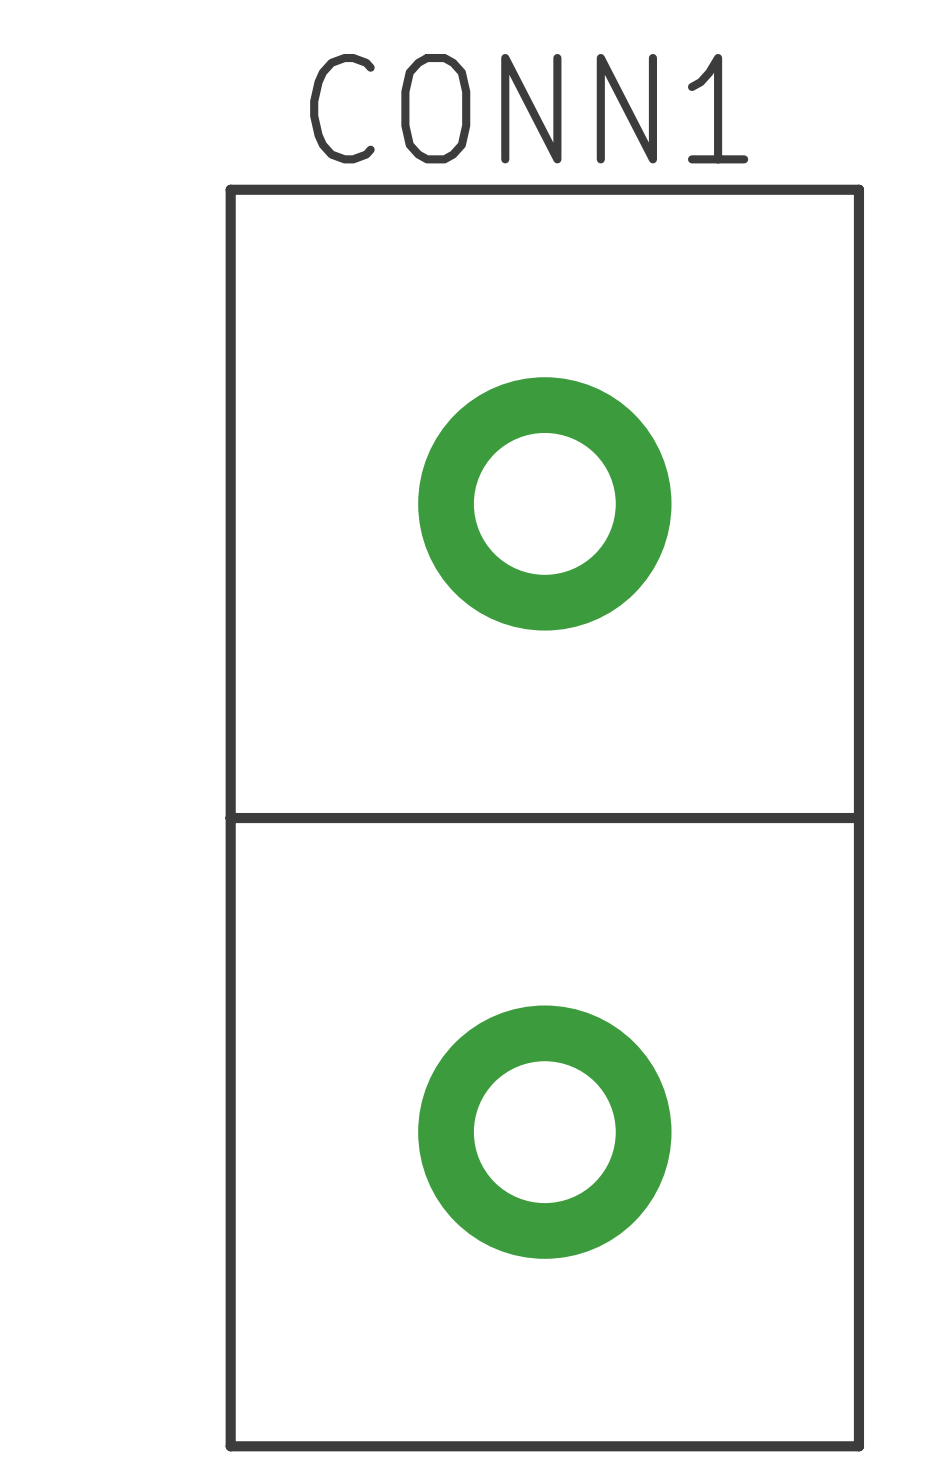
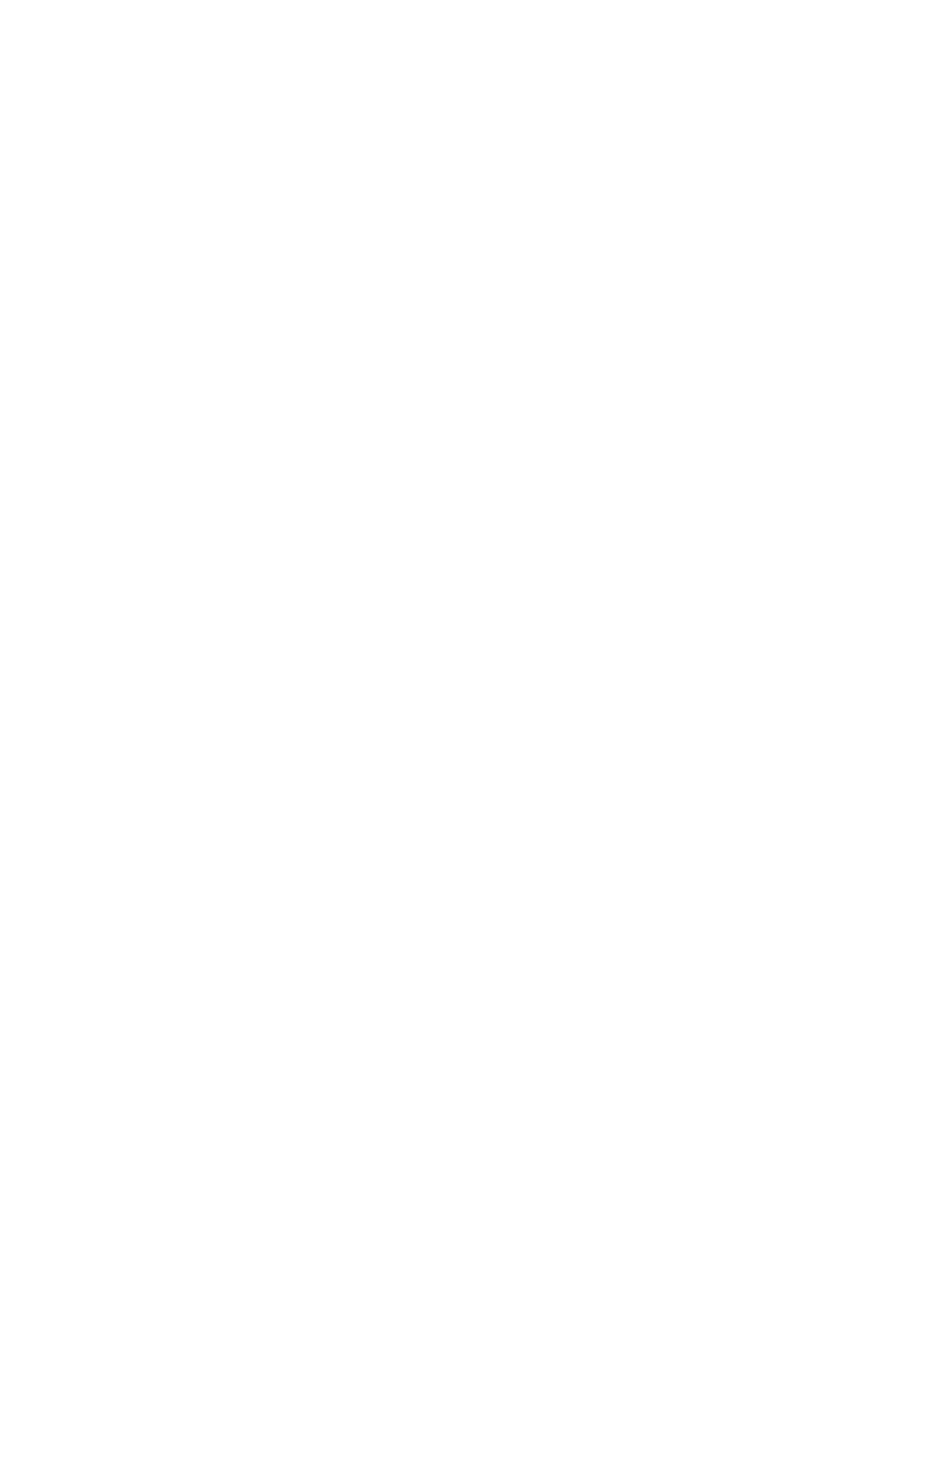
CONN1: (544, 818) -> none

